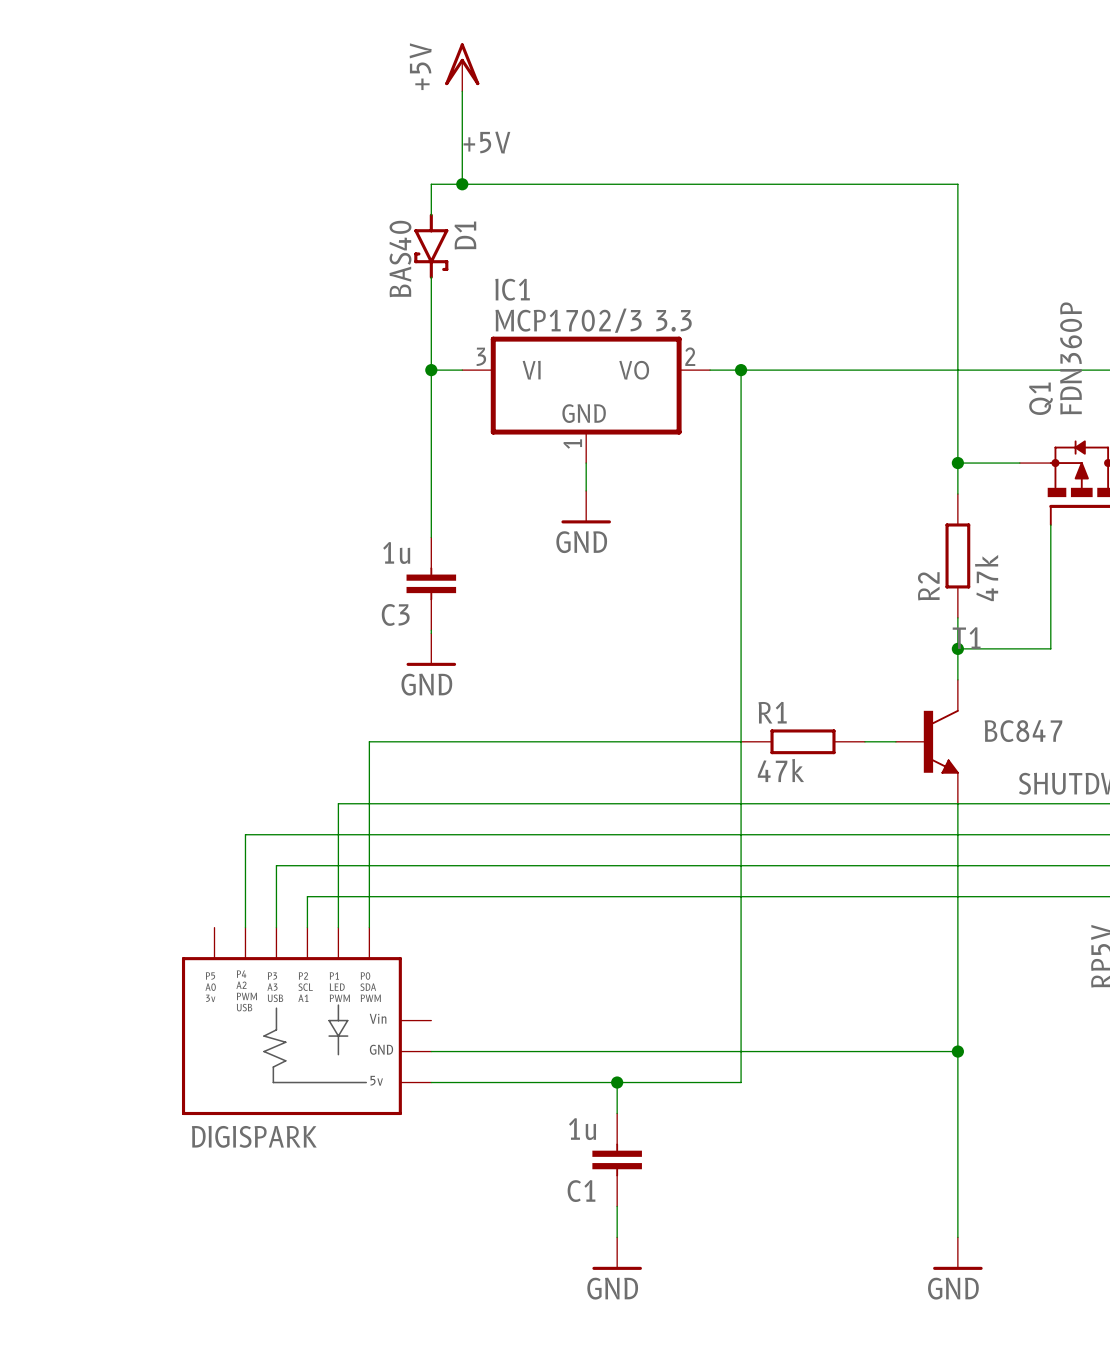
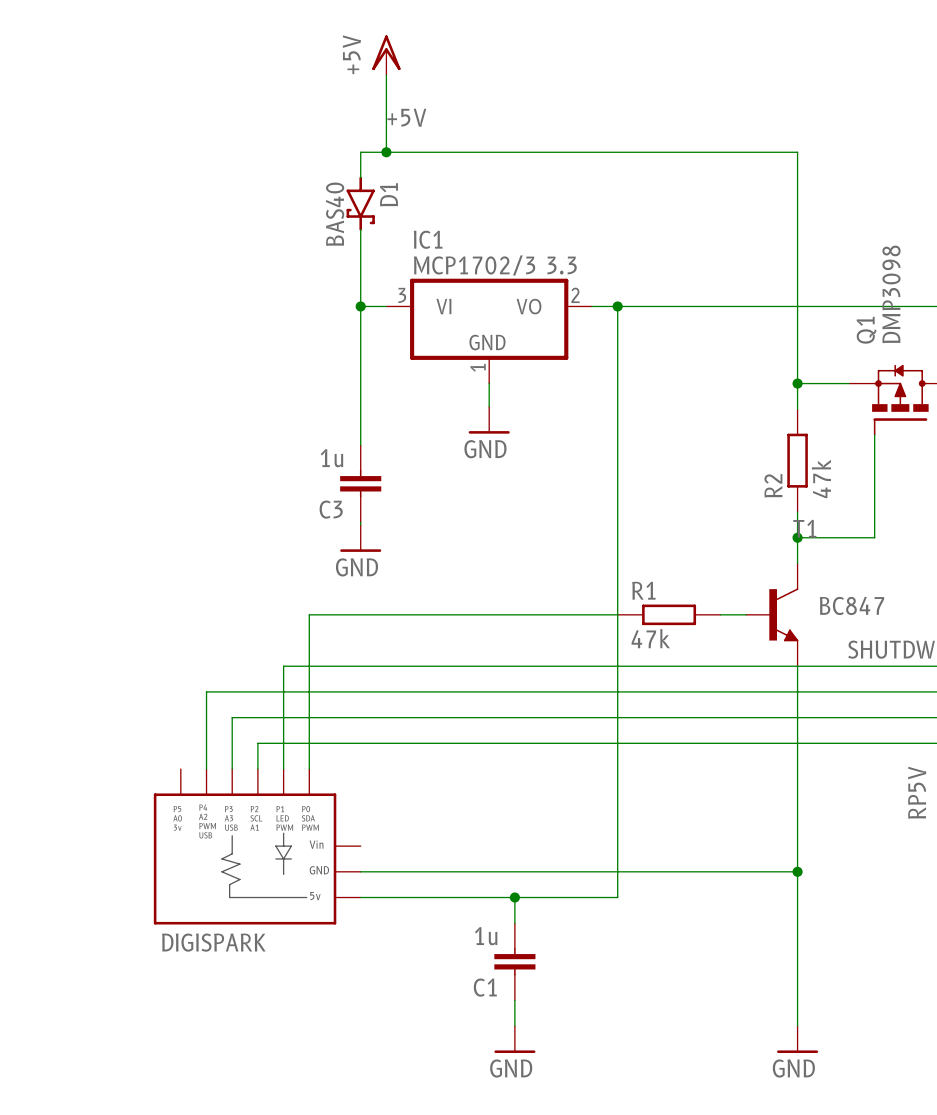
Q1 value: FDN360P (1071, 358) -> DMP3098 (891, 294)

